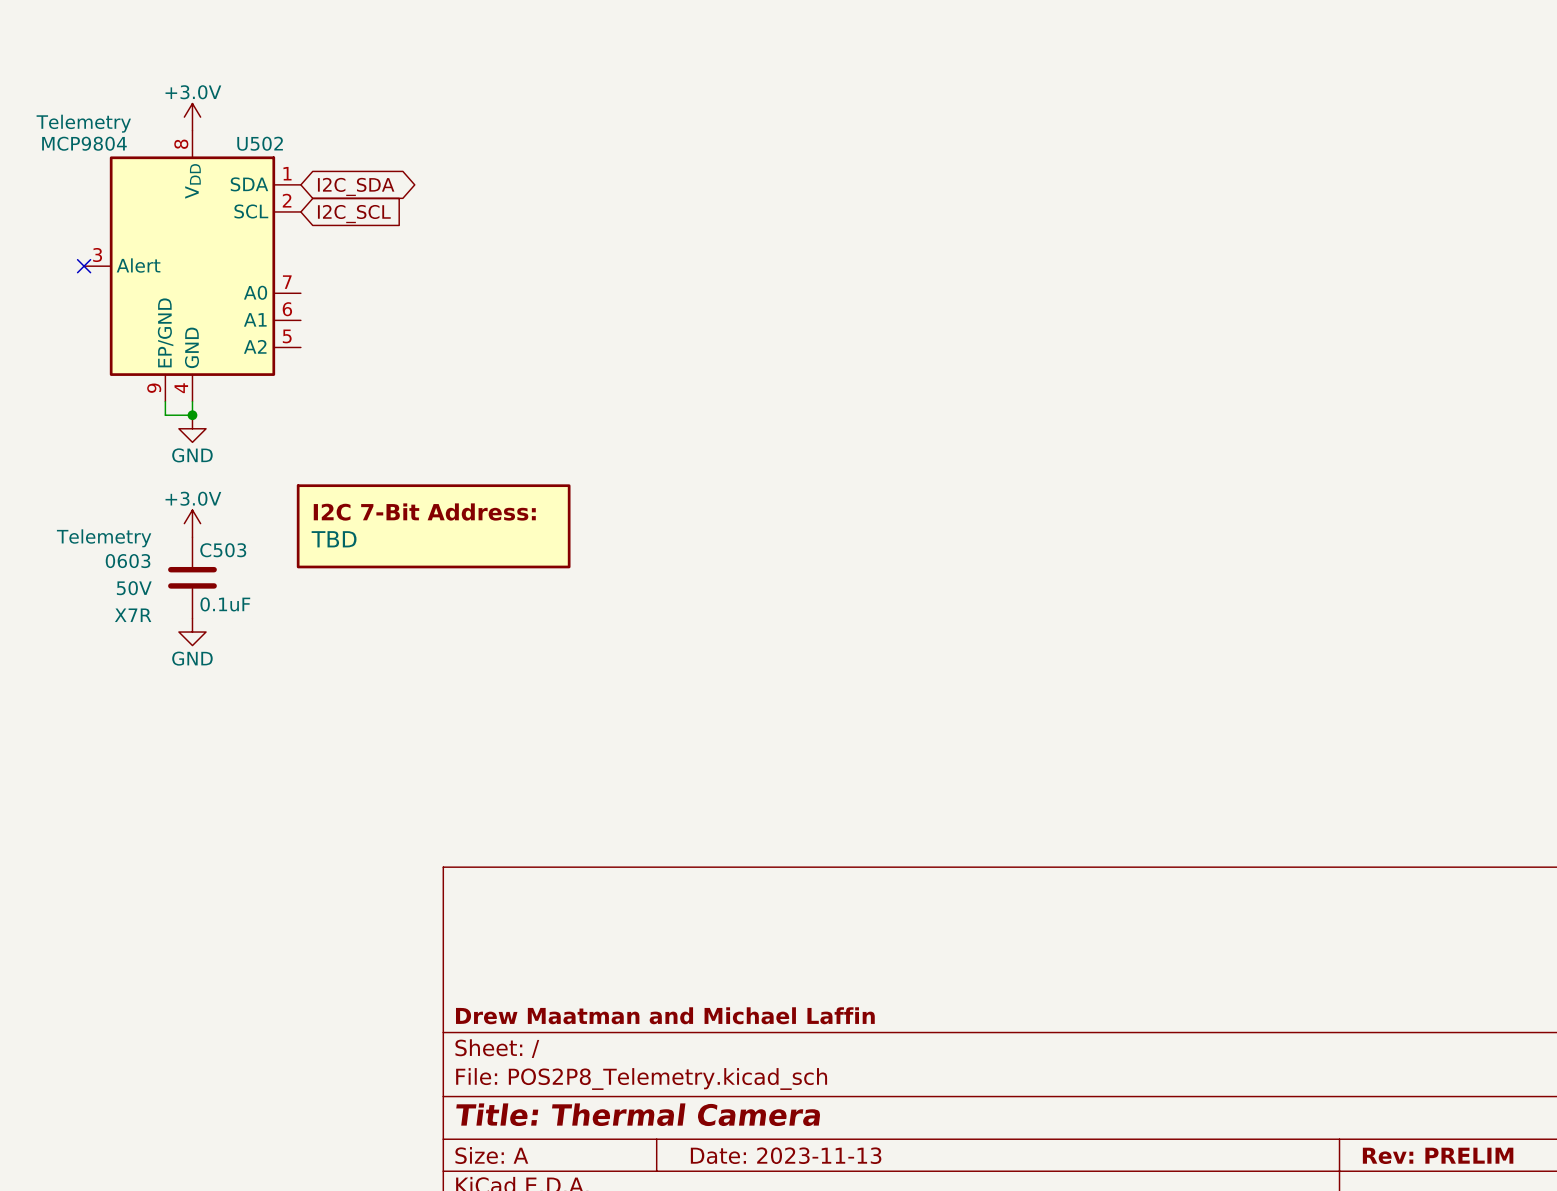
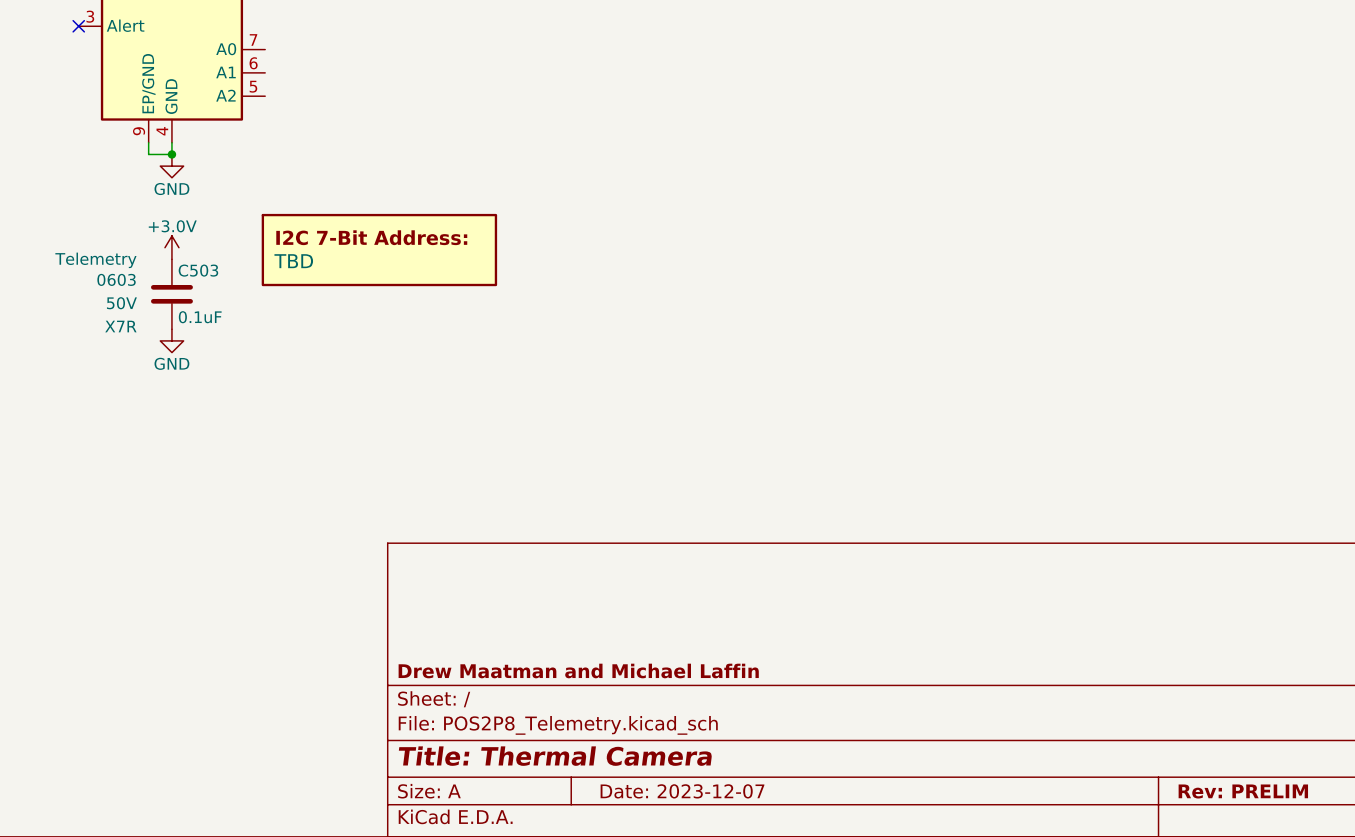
title block: Date: 2023-11-13 (786, 1155) -> Date: 2023-12-07 (682, 791)

